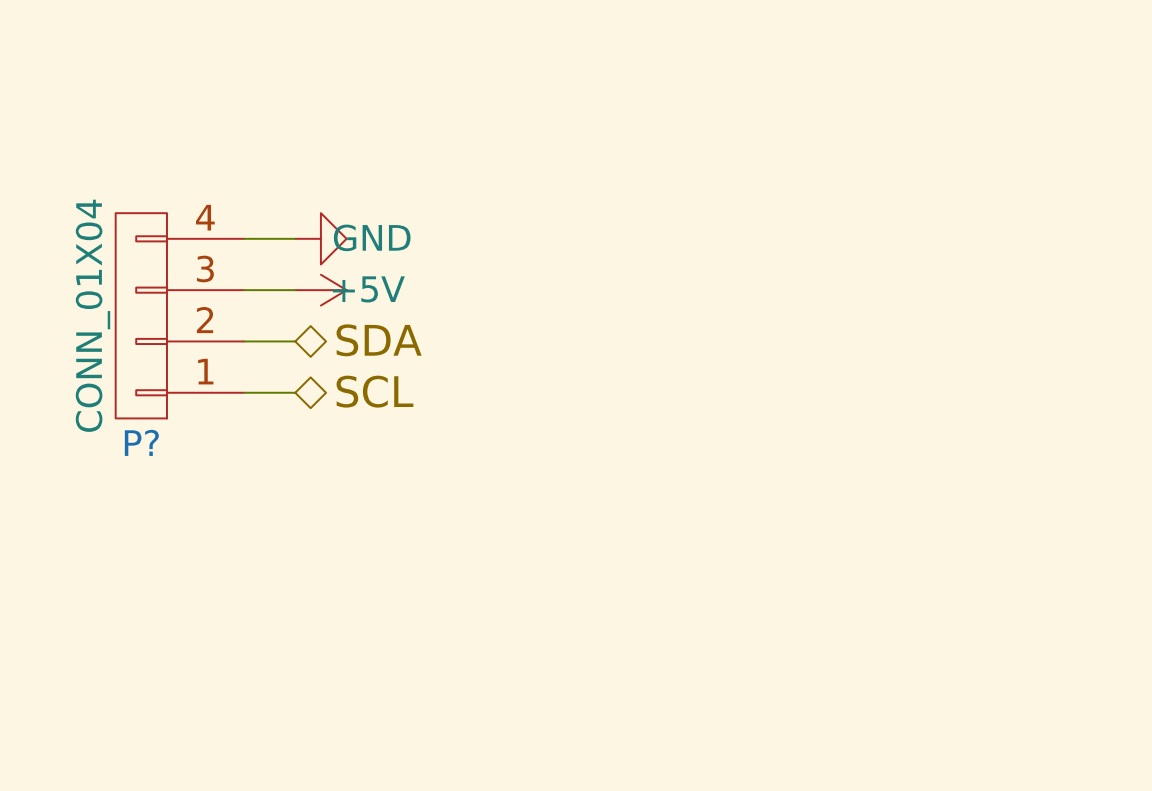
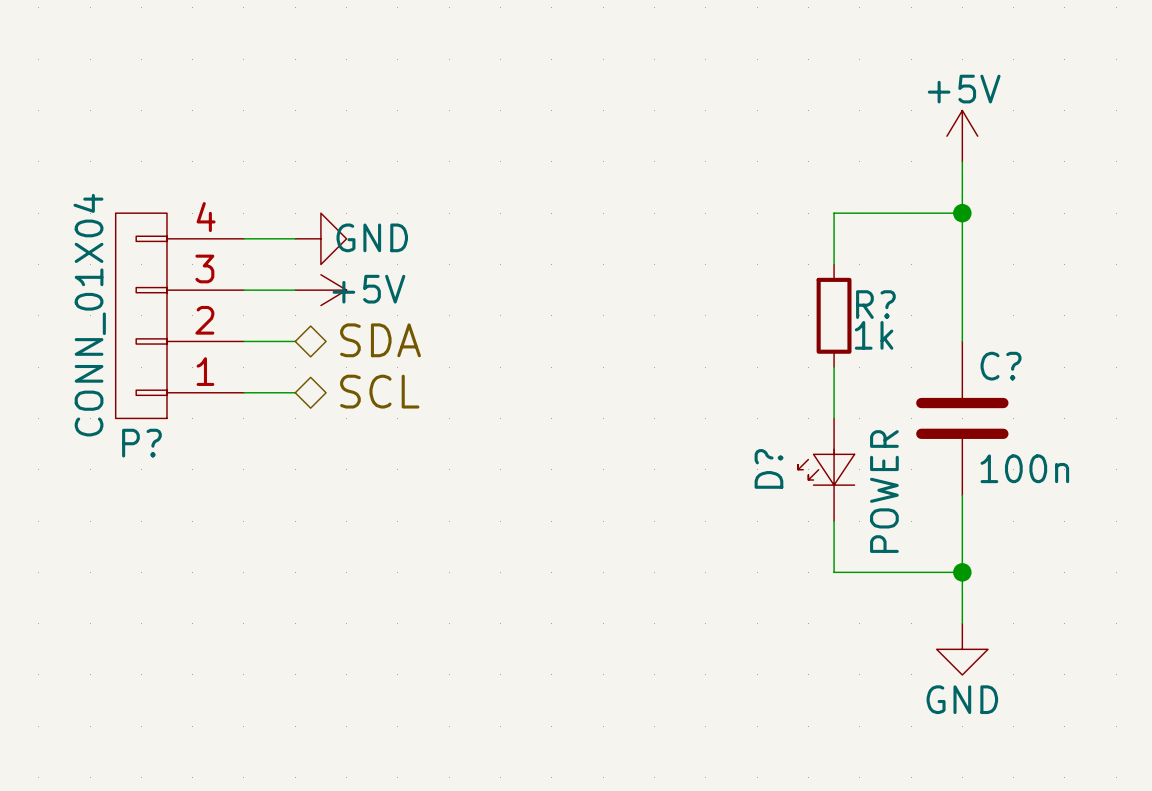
power symbol: none -> +5V (962, 136)
wire: none -> (962, 161) (962, 341)
wire: none -> (962, 213) (834, 213) (834, 264)
junction: none -> (962, 213)
R?: none -> 1k (834, 315)
wire: none -> (834, 367) (834, 418)
C?: none -> 100n (962, 418)
D?: none -> POWER (826, 469)
wire: none -> (962, 495) (962, 623)
wire: none -> (834, 521) (834, 572) (962, 572)
junction: none -> (962, 572)
power symbol: none -> GND (962, 649)

